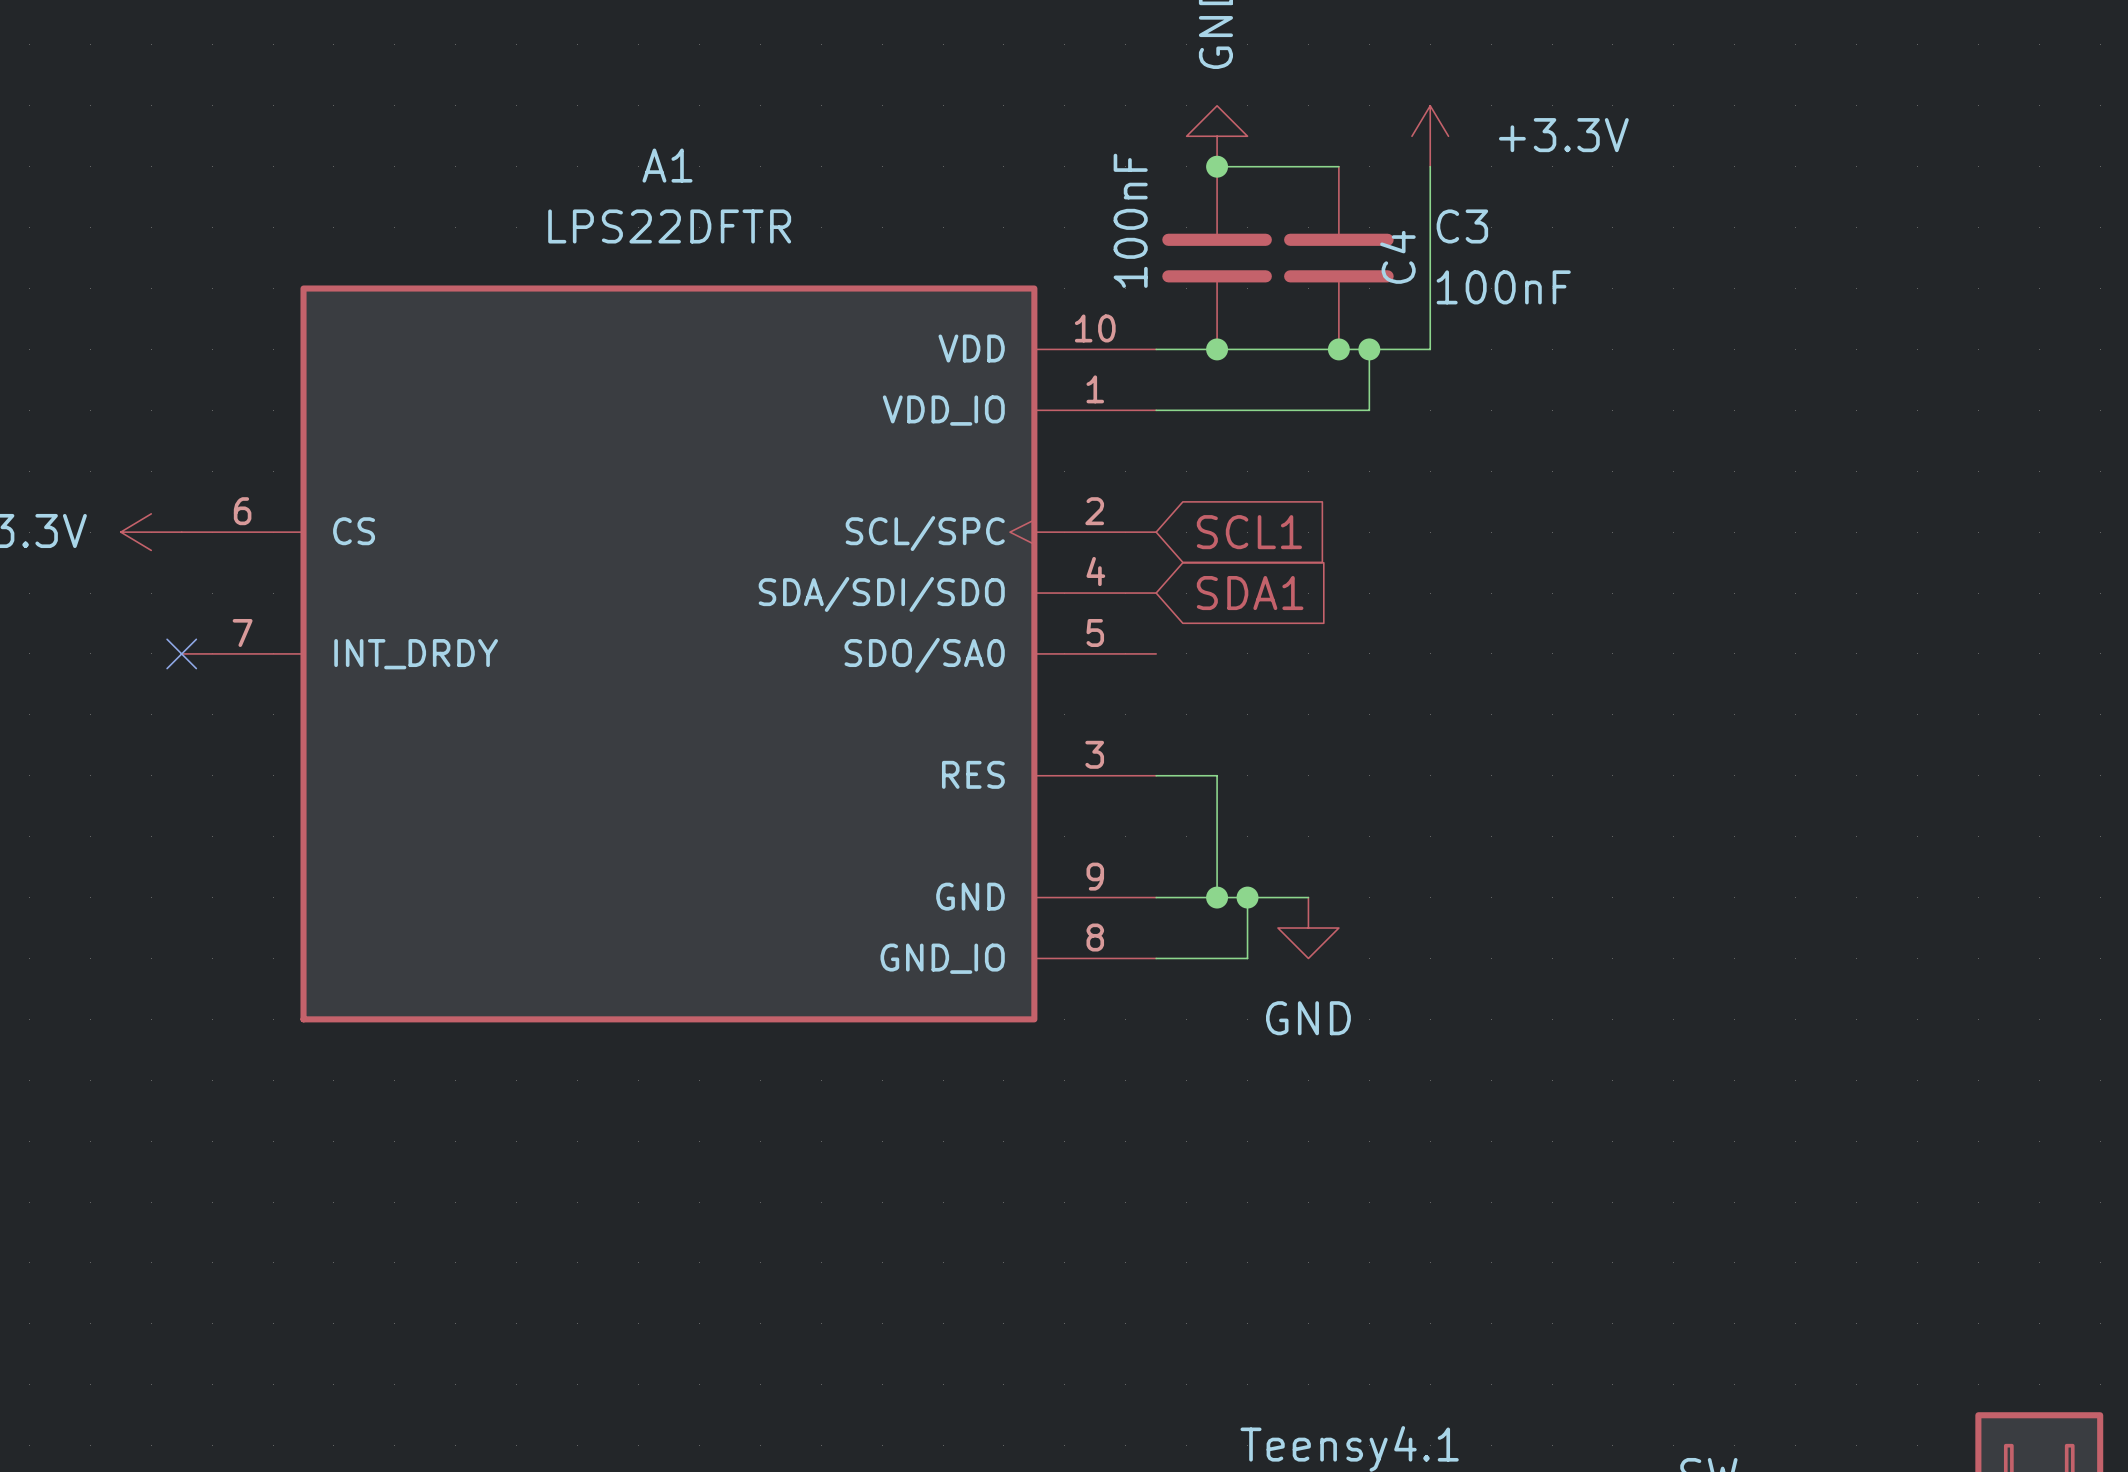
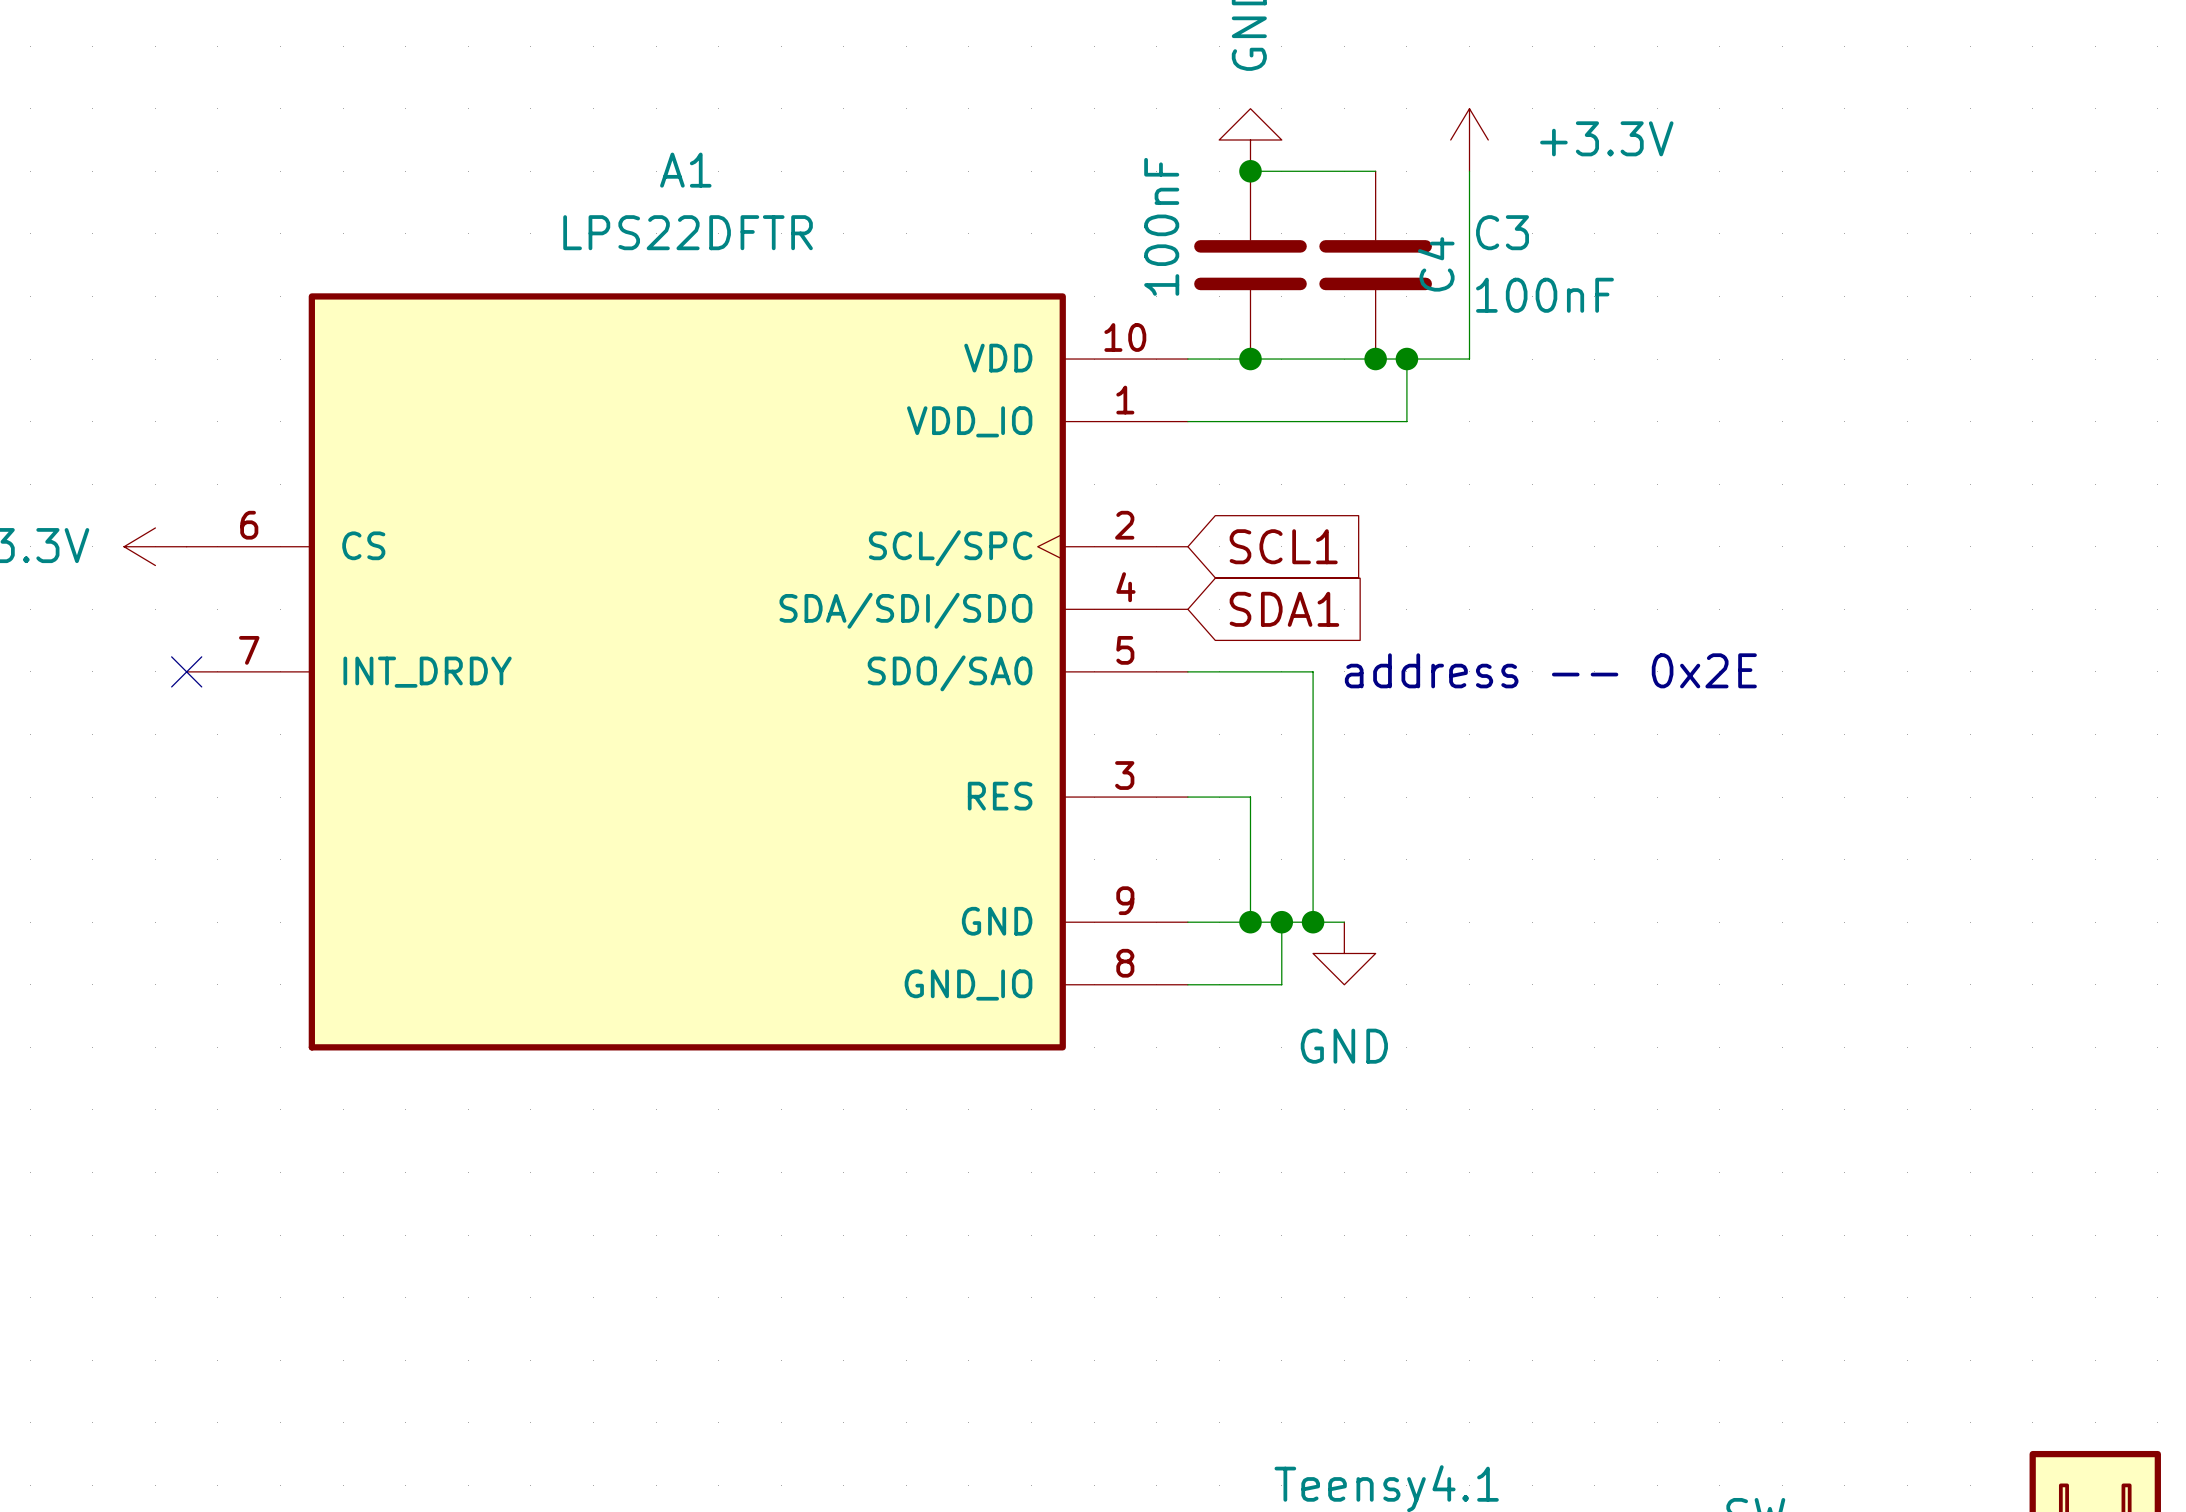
text: none -> address -- 0x2E (1550, 670)
wire: none -> (1187, 671) (1313, 671) (1313, 922)
junction: none -> (1313, 922)

